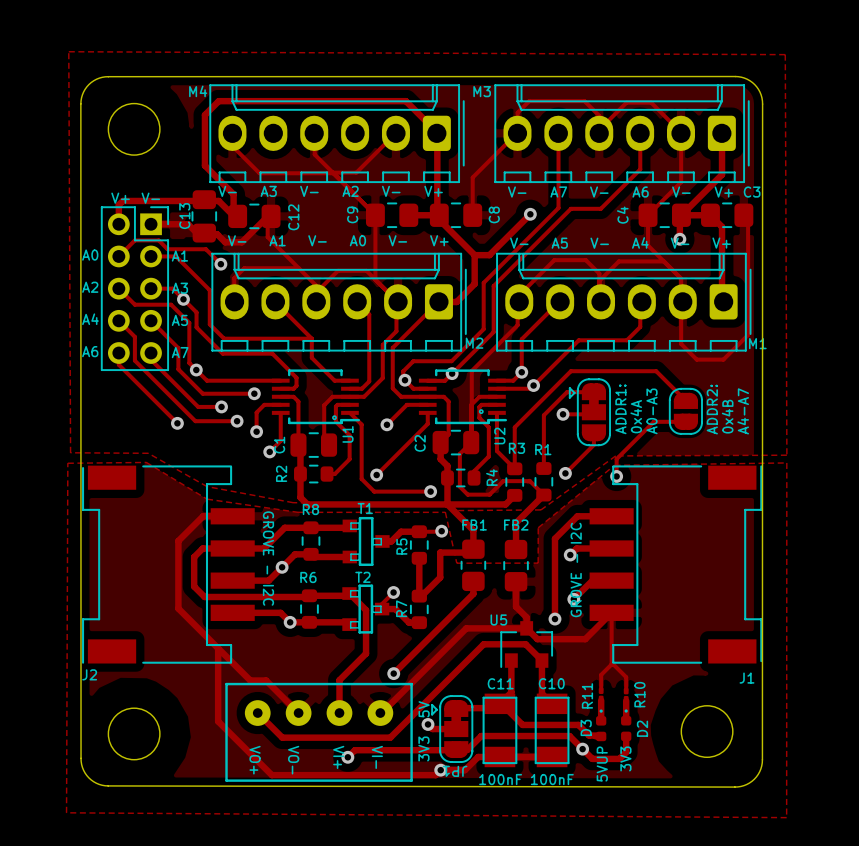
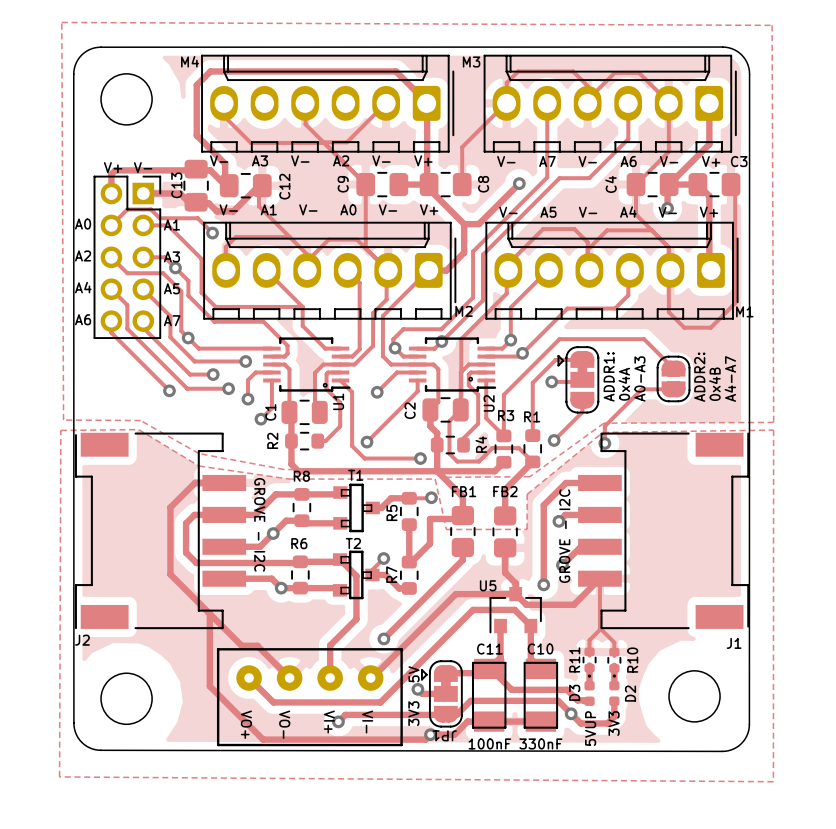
R11 footprint: [598, 687, 604, 703] -> [582, 647, 597, 673]
R10 footprint: [623, 687, 629, 703] -> [607, 647, 622, 673]
C10 value: 100nF (552, 779) -> 330nF (540, 743)

